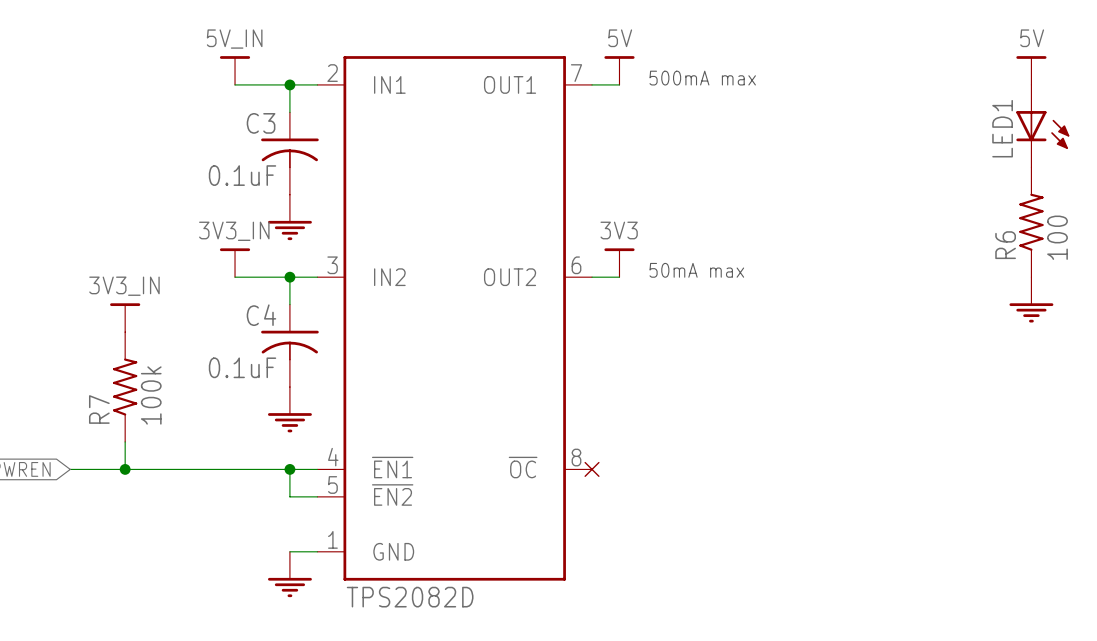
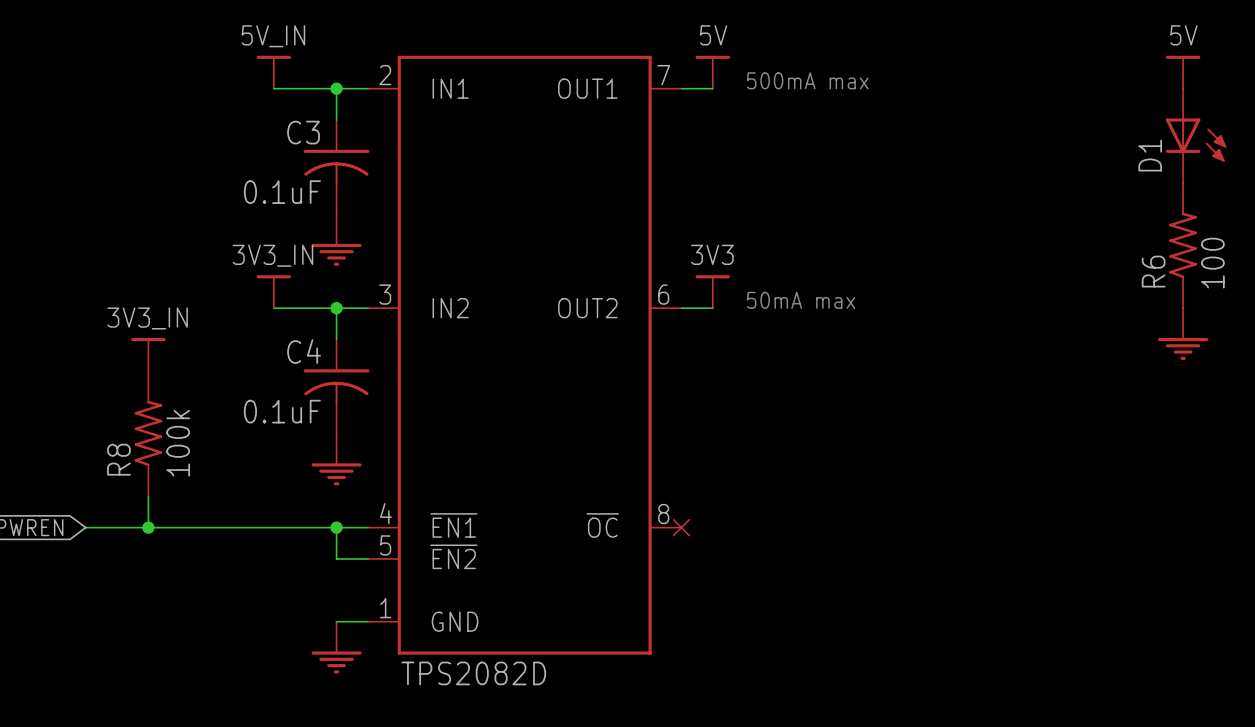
LED1 name: LED1 (1002, 128) -> D1 (1150, 155)
R7 name: R7 (99, 409) -> R8 (118, 459)

